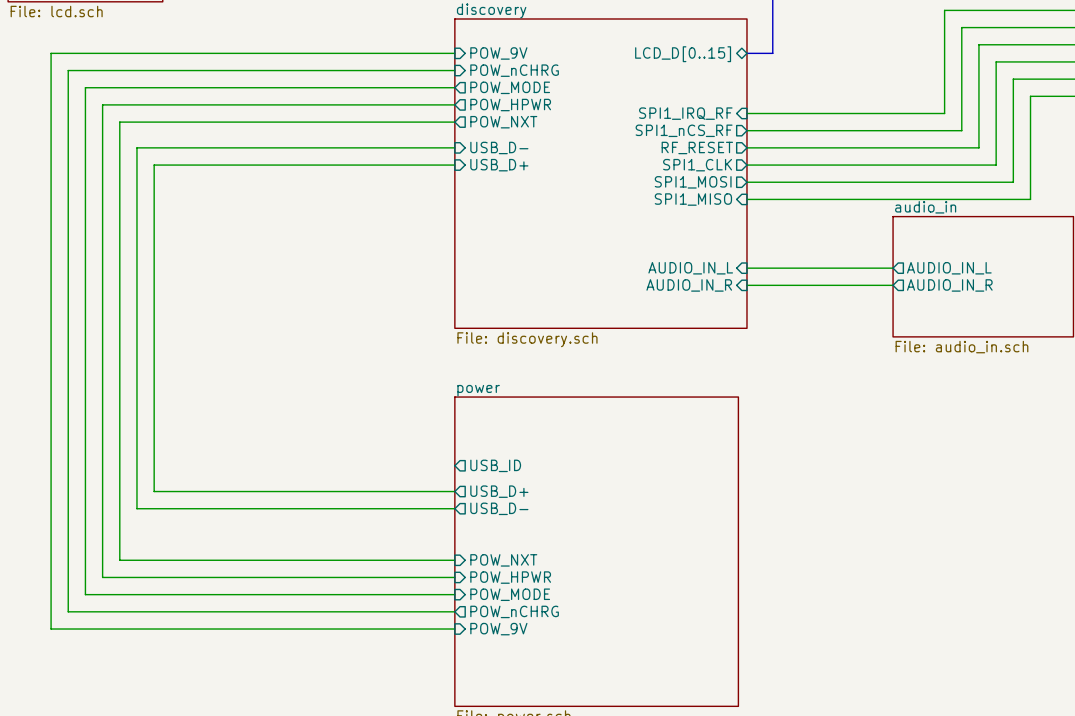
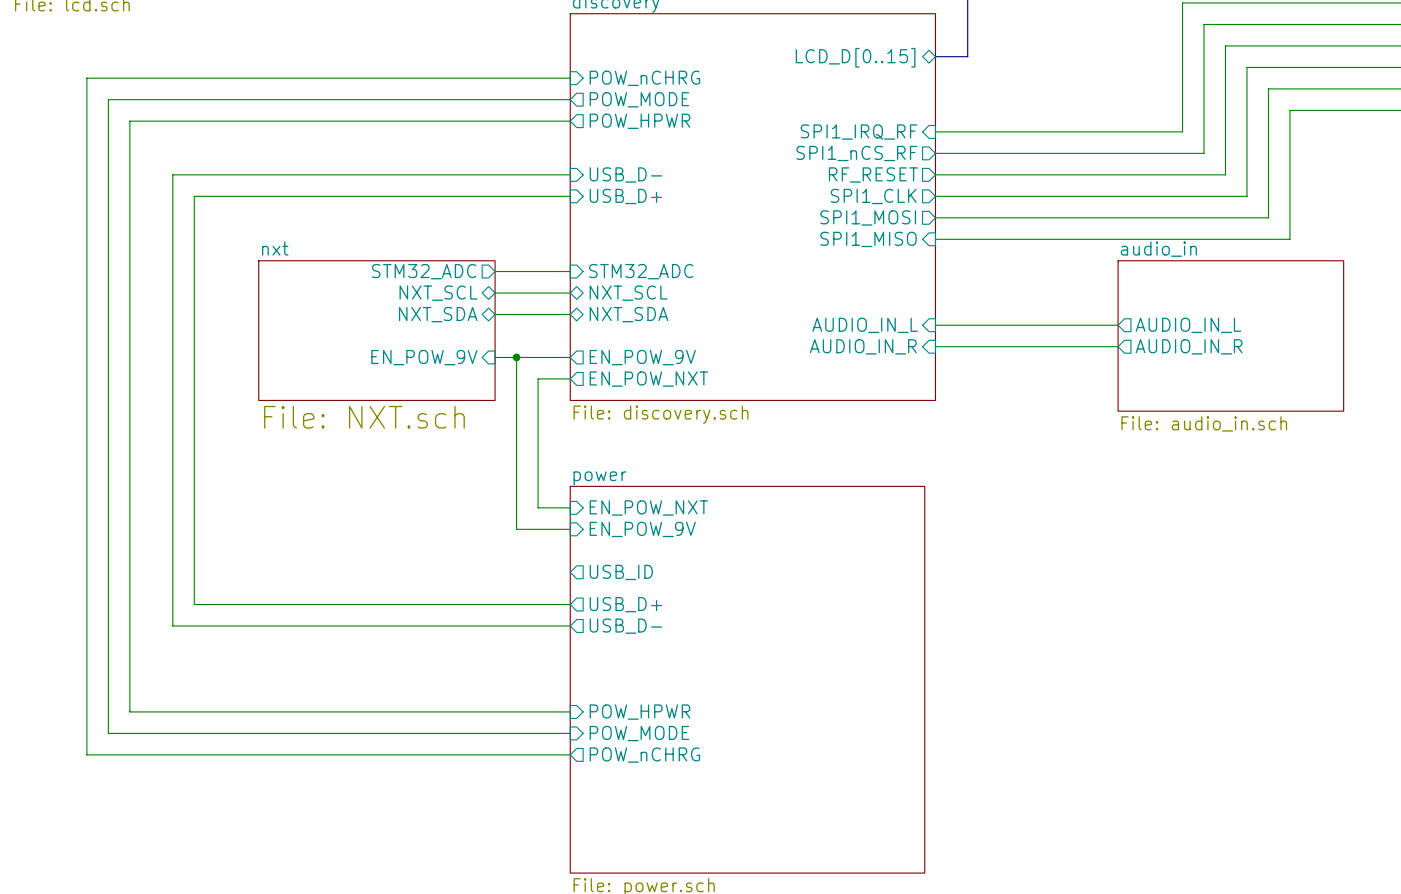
wire: (454, 53) (51, 53) (51, 629) (454, 629) -> none
sheet pin: POW_9V (498, 53) -> none
wire: (454, 122) (119, 122) (119, 560) (454, 560) -> none
sheet pin: POW_NXT (503, 122) -> none
sheet pin: none -> STM32_ADC (424, 271)
wire: none -> (495, 271) (570, 271)
sheet pin: none -> STM32_ADC (641, 271)
sheet pin: none -> NXT_SCL (438, 293)
wire: none -> (495, 293) (570, 293)
sheet pin: none -> NXT_SCL (628, 293)
sheet pin: none -> NXT_SDA (438, 314)
wire: none -> (495, 314) (570, 314)
sheet pin: none -> NXT_SDA (628, 314)
sheet nxt: none -> File: NXT.sch (376, 330)
wire: none -> (495, 357) (570, 357)
wire: none -> (516, 357) (516, 529) (570, 529)
junction: none -> (516, 357)
sheet pin: none -> EN_POW_9V (424, 357)
sheet pin: none -> EN_POW_9V (642, 357)
wire: none -> (570, 378) (538, 378) (538, 507) (570, 507)
sheet pin: none -> EN_POW_NXT (648, 379)
sheet pin: none -> EN_POW_NXT (648, 507)
sheet pin: none -> EN_POW_9V (642, 529)
sheet pin: POW_NXT (503, 560) -> none
sheet pin: POW_9V (498, 629) -> none

